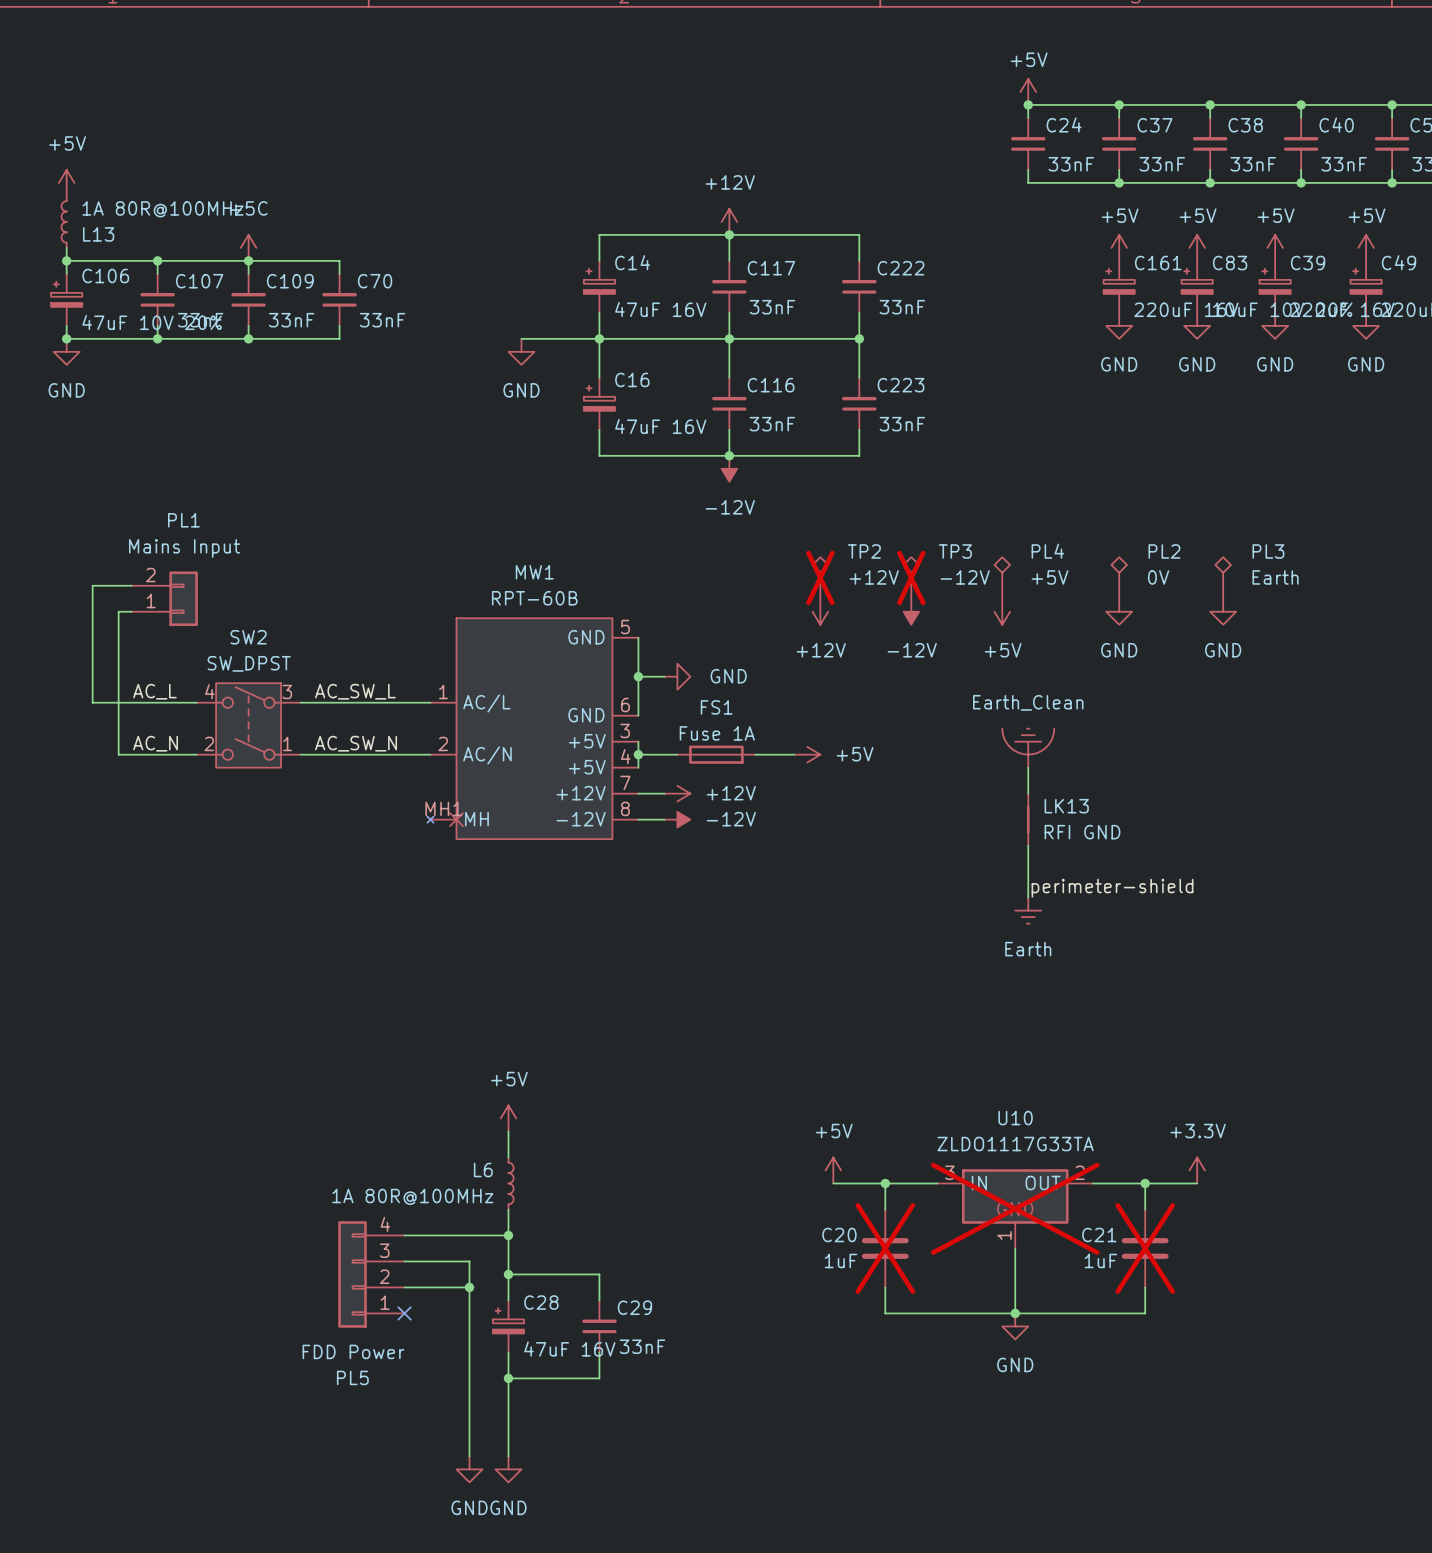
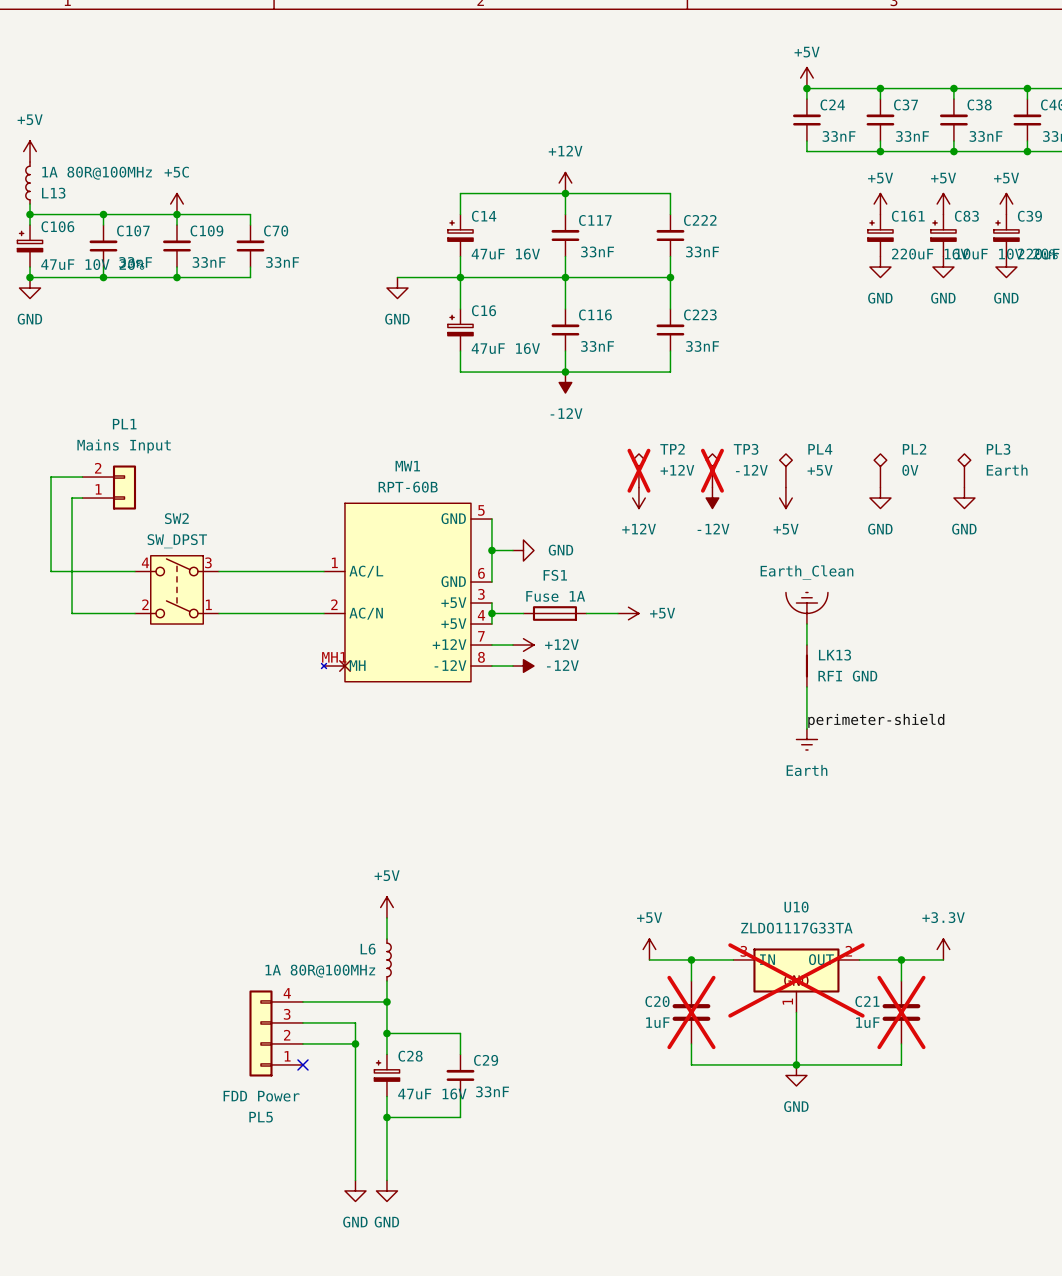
label: AC_L (154, 691) -> none
label: AC_SW_L (355, 691) -> none
label: AC_N (155, 743) -> none
label: AC_SW_N (356, 743) -> none

